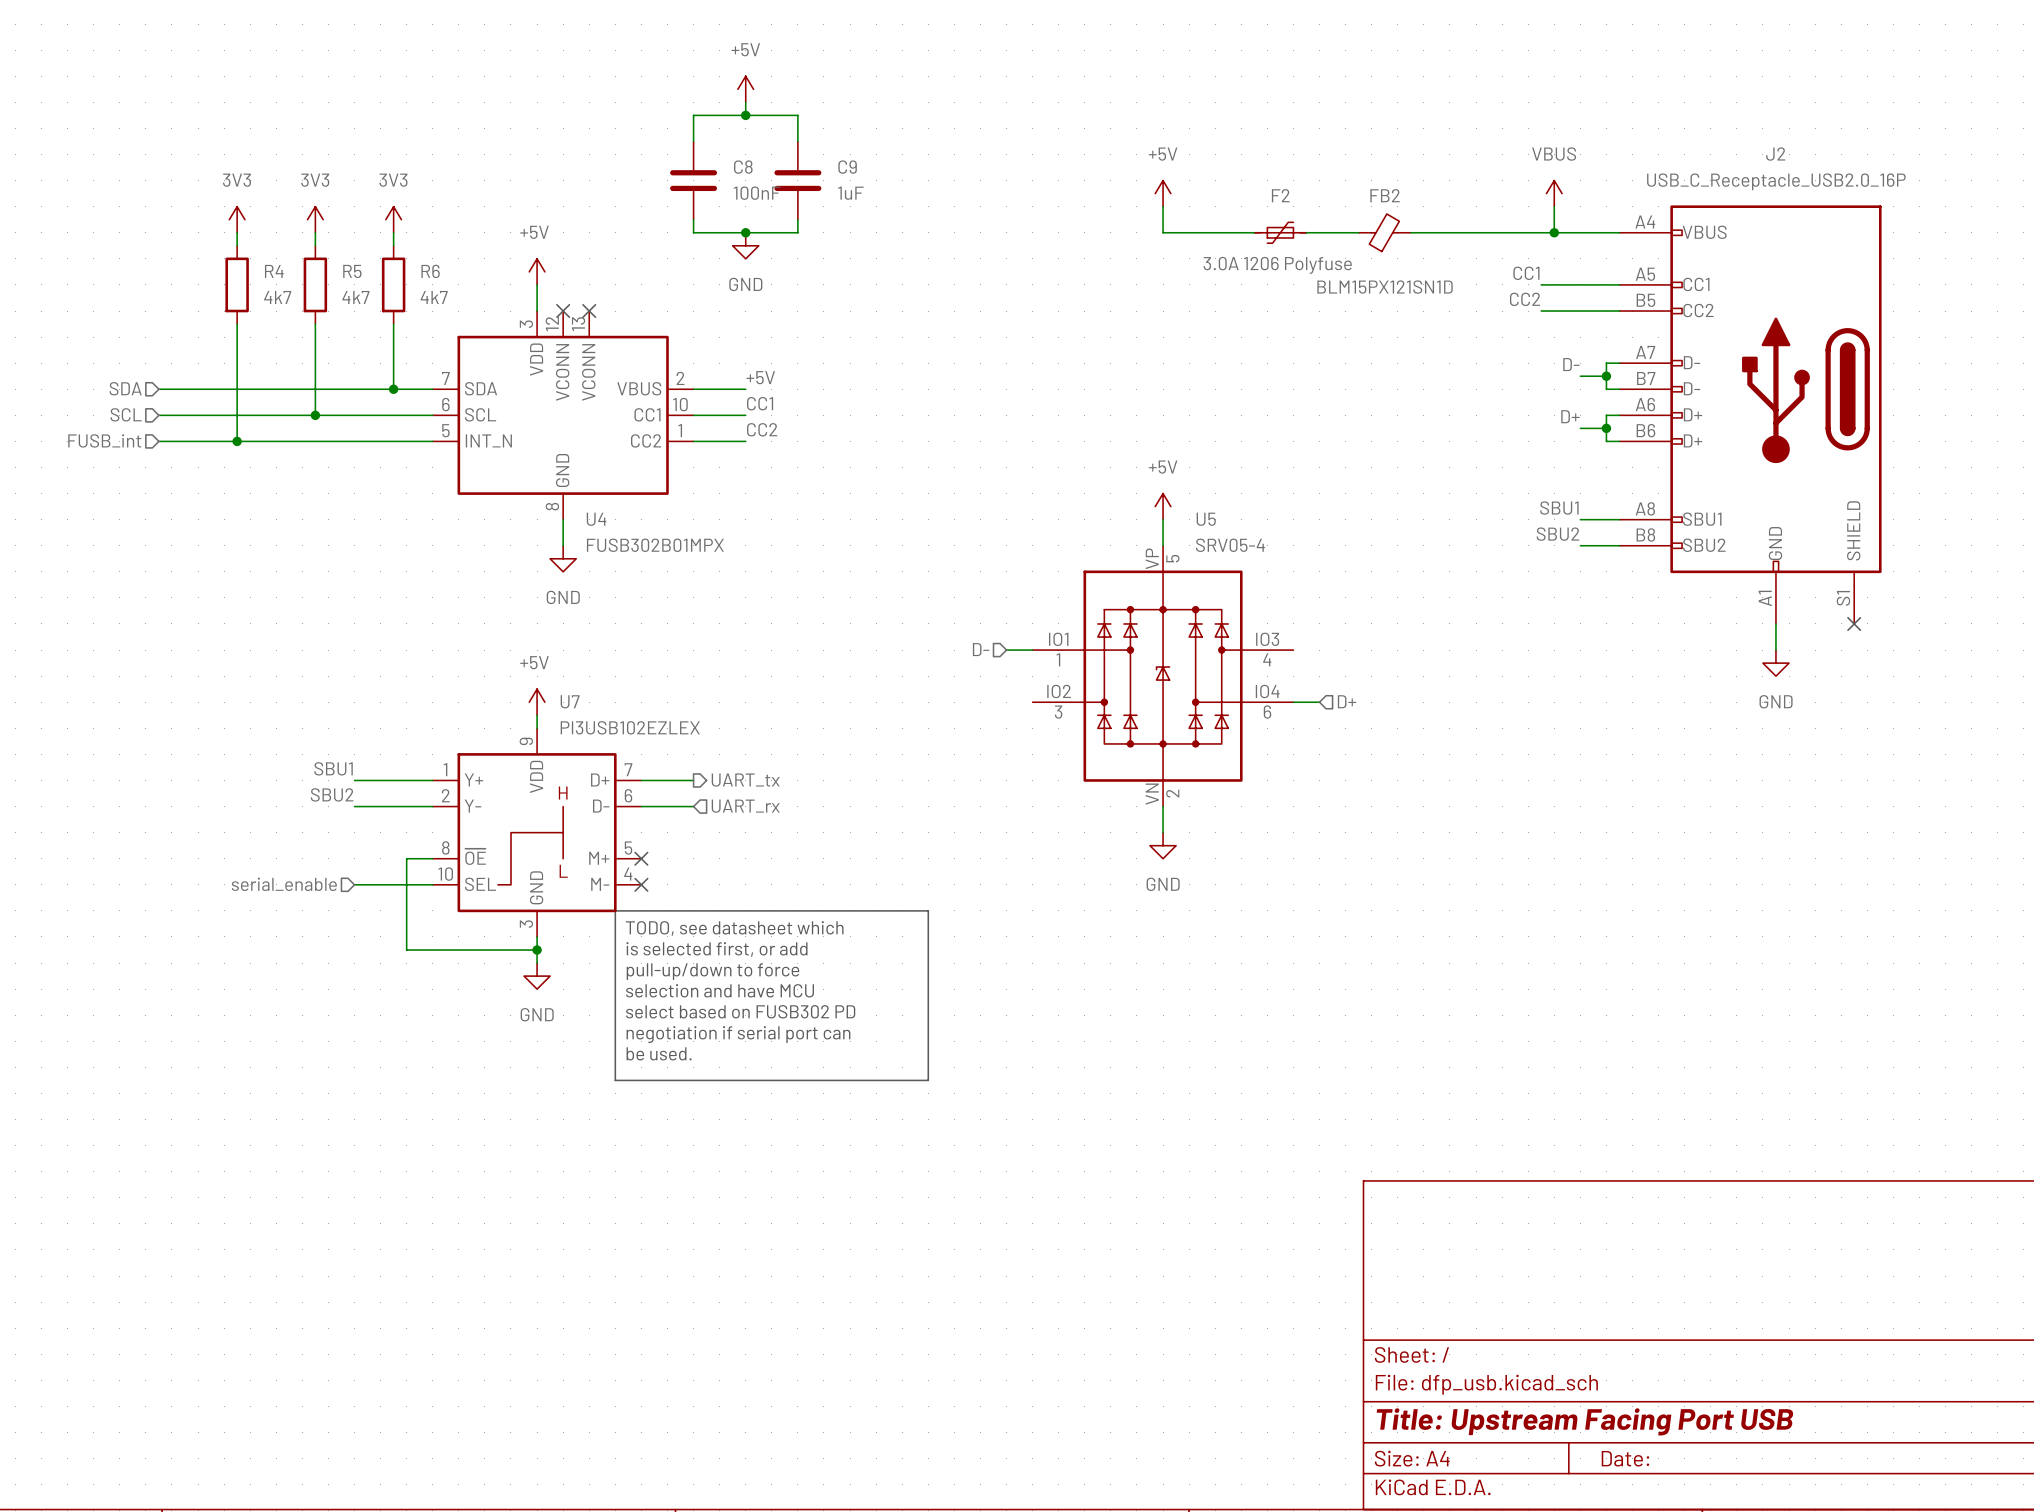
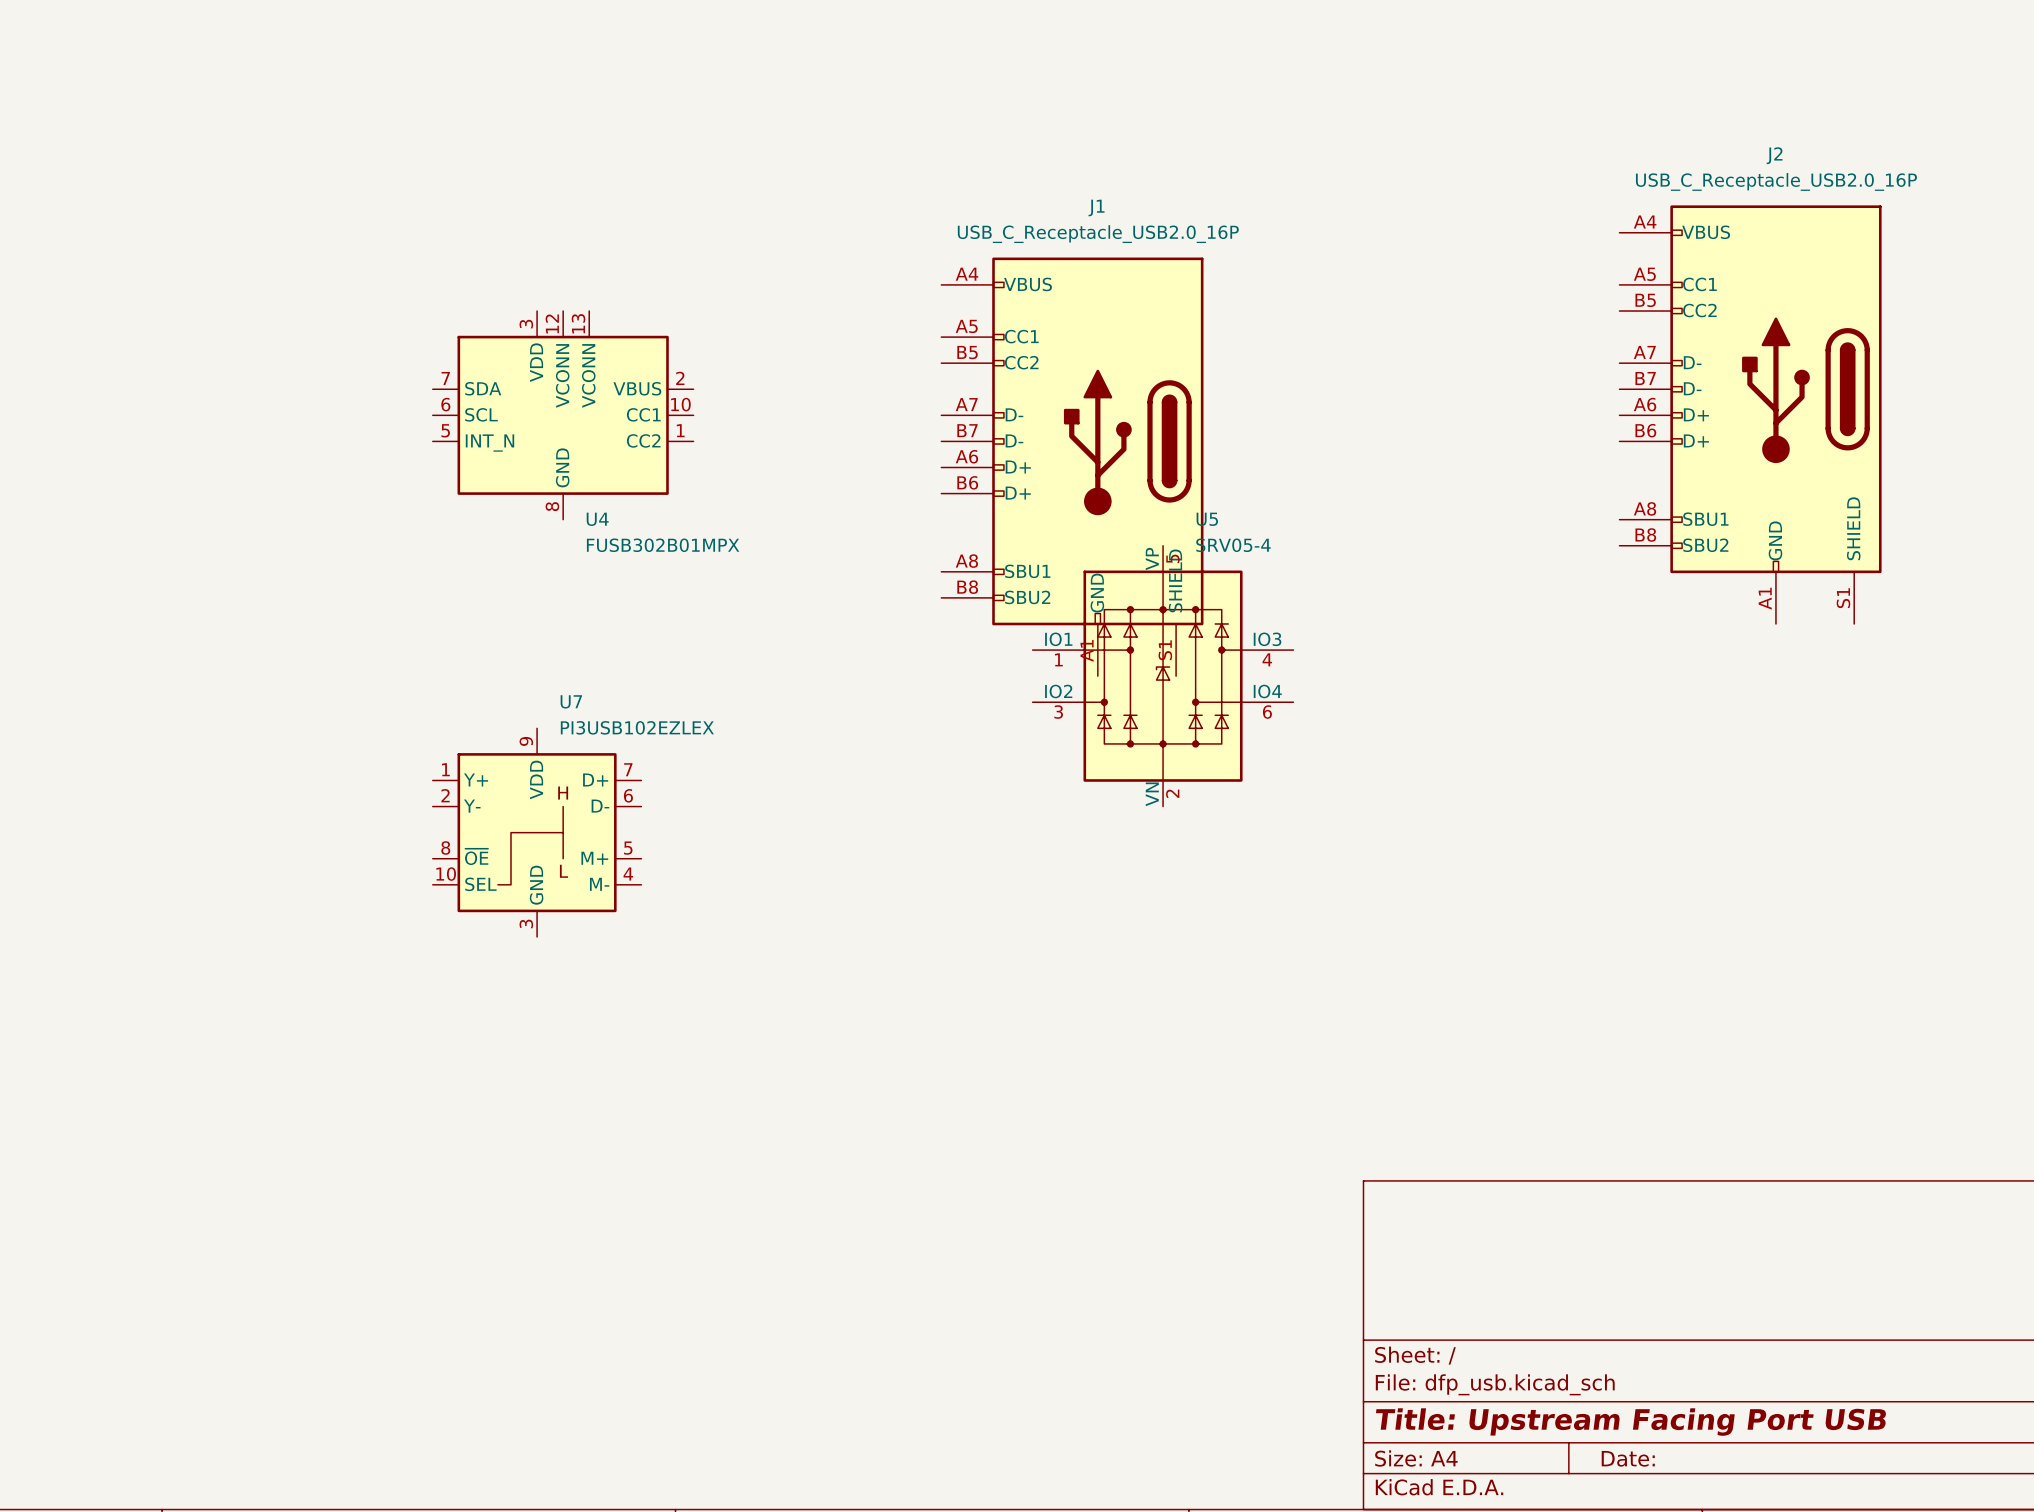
power symbol: +5V (745, 89) -> none
wire: (745, 102) (745, 115) -> none
junction: (745, 115) -> none
wire: (693, 141) (693, 115) (797, 115) (797, 141) -> none
C8: 100nF (693, 180) -> none
C9: 1uF (797, 180) -> none
power symbol: +5V (1163, 193) -> none
power symbol: VBUS (1554, 193) -> none
wire: (1163, 206) (1163, 232) (1254, 232) -> none
wire: (1554, 206) (1554, 232) -> none
power symbol: 3V3 (237, 219) -> none
power symbol: 3V3 (315, 219) -> none
power symbol: 3V3 (393, 219) -> none
wire: (693, 219) (693, 232) (797, 232) (797, 219) -> none
wire: (237, 232) (237, 245) -> none
wire: (315, 232) (315, 245) -> none
wire: (393, 232) (393, 245) -> none
junction: (745, 232) -> none
F2: 3.0A 1206 Polyfuse (1280, 232) -> none
wire: (1306, 232) (1358, 232) -> none
FB2: BLM15PX121SN1D (1384, 232) -> none
wire: (1410, 232) (1619, 232) -> none
junction: (1554, 232) -> none
power symbol: GND (745, 245) -> none
power symbol: +5V (537, 271) -> none
label: CC1 (1526, 273) -> none
R4: 4k7 (237, 284) -> none
R5: 4k7 (315, 284) -> none
R6: 4k7 (393, 284) -> none
wire: (537, 284) (537, 311) -> none
wire: (1541, 284) (1619, 284) -> none
label: CC2 (1525, 299) -> none
no-connect mark: (563, 311) -> none
no-connect mark: (589, 311) -> none
wire: (1541, 311) (1619, 311) -> none
wire: (237, 324) (237, 441) -> none
wire: (315, 324) (315, 415) -> none
wire: (393, 324) (393, 389) -> none
wire: (1619, 363) (1606, 363) (1606, 389) (1619, 389) -> none
label: D- (1571, 364) -> none
wire: (1580, 376) (1606, 376) -> none
junction: (1606, 376) -> none
label: +5V (760, 377) -> none
hierarchical label: SDA (125, 388) -> none
wire: (158, 389) (432, 389) -> none
junction: (393, 389) -> none
wire: (693, 389) (745, 389) -> none
label: CC1 (760, 403) -> none
hierarchical label: SCL (126, 414) -> none
wire: (158, 415) (432, 415) -> none
junction: (315, 415) -> none
wire: (693, 415) (745, 415) -> none
wire: (1619, 415) (1606, 415) (1606, 441) (1619, 441) -> none
label: D+ (1570, 416) -> none
wire: (1580, 428) (1606, 428) -> none
junction: (1606, 428) -> none
label: CC2 (762, 429) -> none
hierarchical label: FUSB_int (104, 440) -> none
wire: (158, 441) (432, 441) -> none
junction: (237, 441) -> none
wire: (693, 441) (745, 441) -> none
J1: none -> USB_C_Receptacle_USB2.0_16P (1072, 466)
power symbol: +5V (1163, 506) -> none
label: SBU1 (1559, 508) -> none
wire: (563, 519) (563, 545) -> none
wire: (1580, 519) (1619, 519) -> none
label: SBU2 (1557, 534) -> none
wire: (1580, 545) (1619, 545) -> none
power symbol: GND (563, 558) -> none
wire: (1775, 623) (1775, 650) -> none
no-connect mark: (1854, 623) -> none
hierarchical label: D- (981, 649) -> none
wire: (1006, 650) (1032, 650) -> none
power symbol: GND (1775, 663) -> none
hierarchical label: D+ (1347, 701) -> none
power symbol: +5V (537, 702) -> none
wire: (1293, 702) (1319, 702) -> none
wire: (537, 715) (537, 728) -> none
label: SBU1 (333, 768) -> none
wire: (354, 780) (432, 780) -> none
wire: (641, 780) (693, 780) -> none
hierarchical label: UART_tx (745, 780) -> none
label: SBU2 (332, 794) -> none
wire: (354, 806) (432, 806) -> none
wire: (641, 806) (693, 806) -> none
hierarchical label: UART_rx (745, 806) -> none
wire: (1163, 806) (1163, 832) -> none
power symbol: GND (1163, 845) -> none
wire: (432, 858) (406, 858) (406, 950) (537, 950) -> none
no-connect mark: (641, 858) -> none
hierarchical label: serial_enable (284, 884) -> none
wire: (354, 884) (432, 884) -> none
no-connect mark: (641, 884) -> none
line: (615, 910) (928, 910) (928, 1080) (615, 1080) (615, 910) -> none
text: TODO, see datasheet which (734, 928) -> none
wire: (537, 936) (537, 963) -> none
text: is selected first, or add (716, 949) -> none
junction: (537, 950) -> none
text: pull-up/down to force (712, 971) -> none
power symbol: GND (537, 976) -> none
text: selection and have MCU (720, 990) -> none
text: select based on FUSB302 PD (740, 1011) -> none
text: negotiation if serial port can (738, 1034) -> none
text: be used. (659, 1053) -> none

